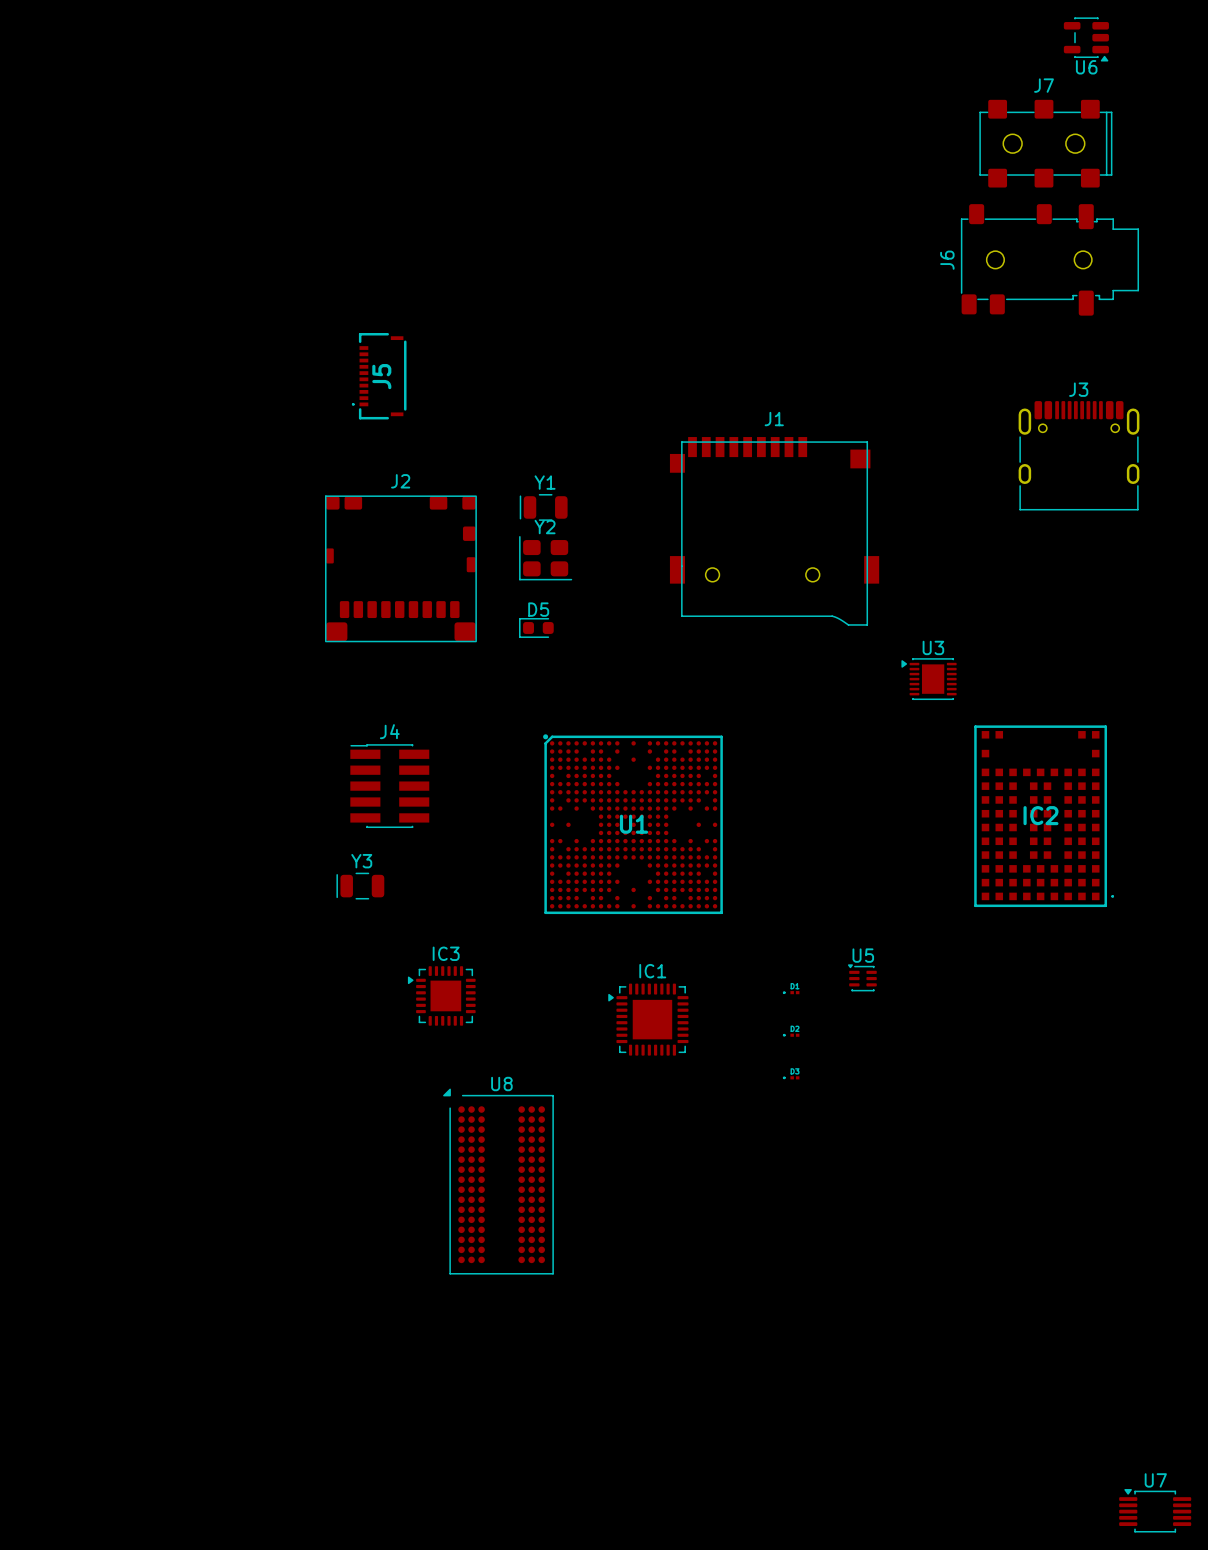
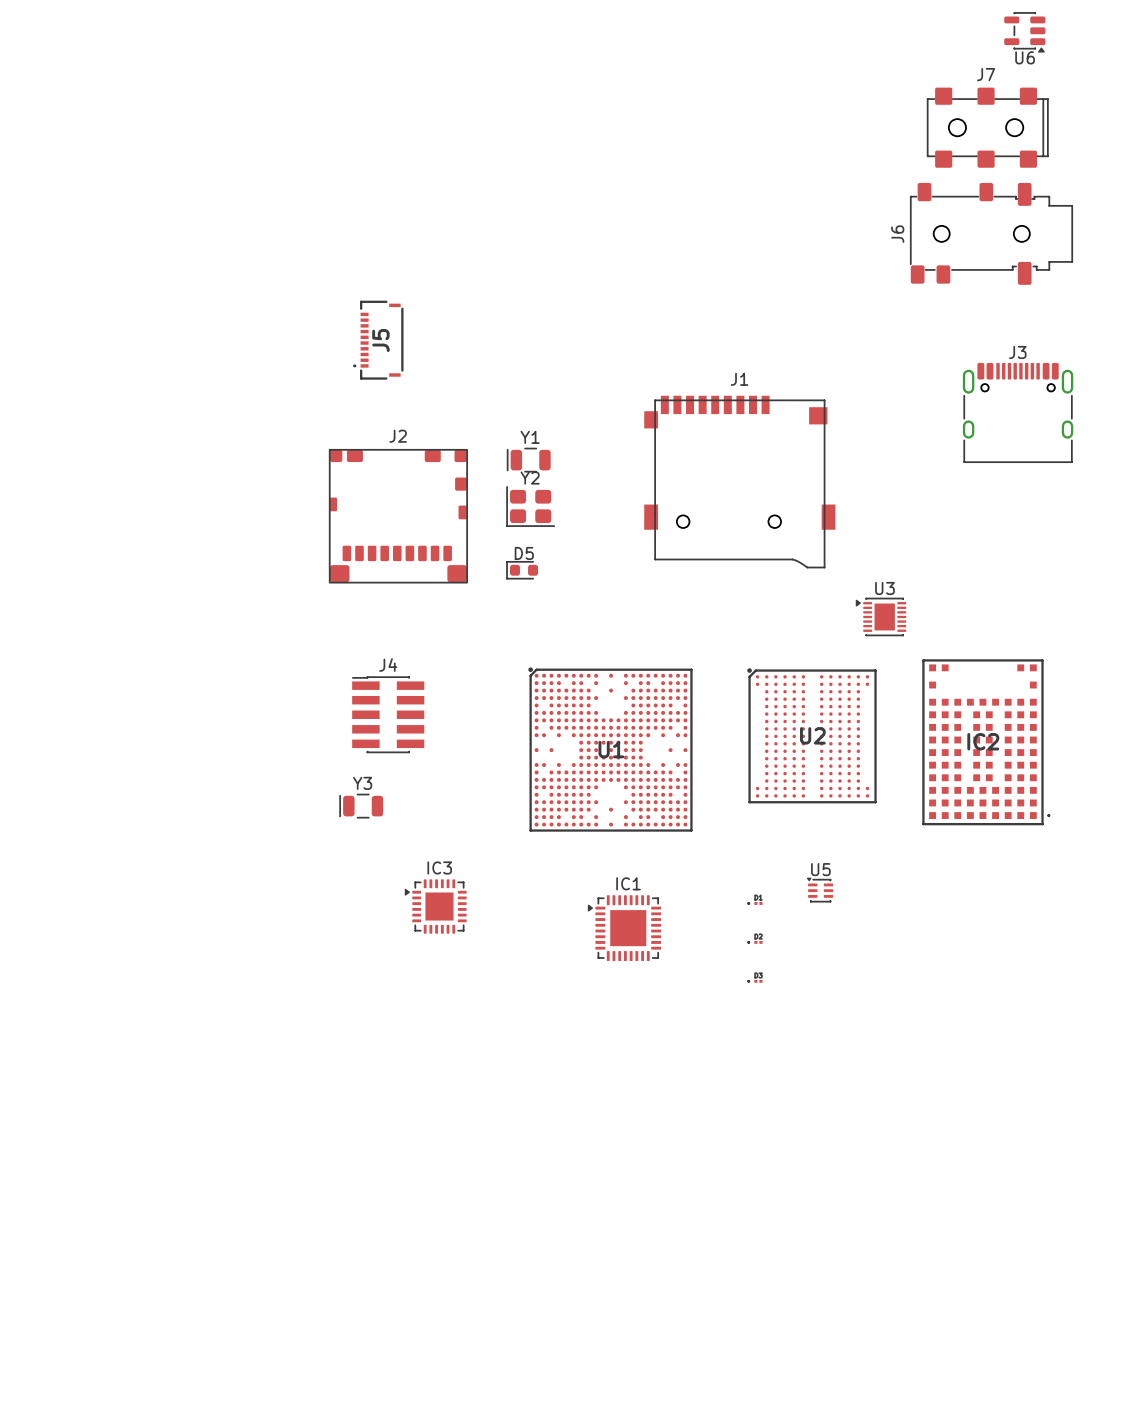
U2: none -> (811, 735)
U8: (498, 1181) -> none
U7: (1155, 1510) -> none

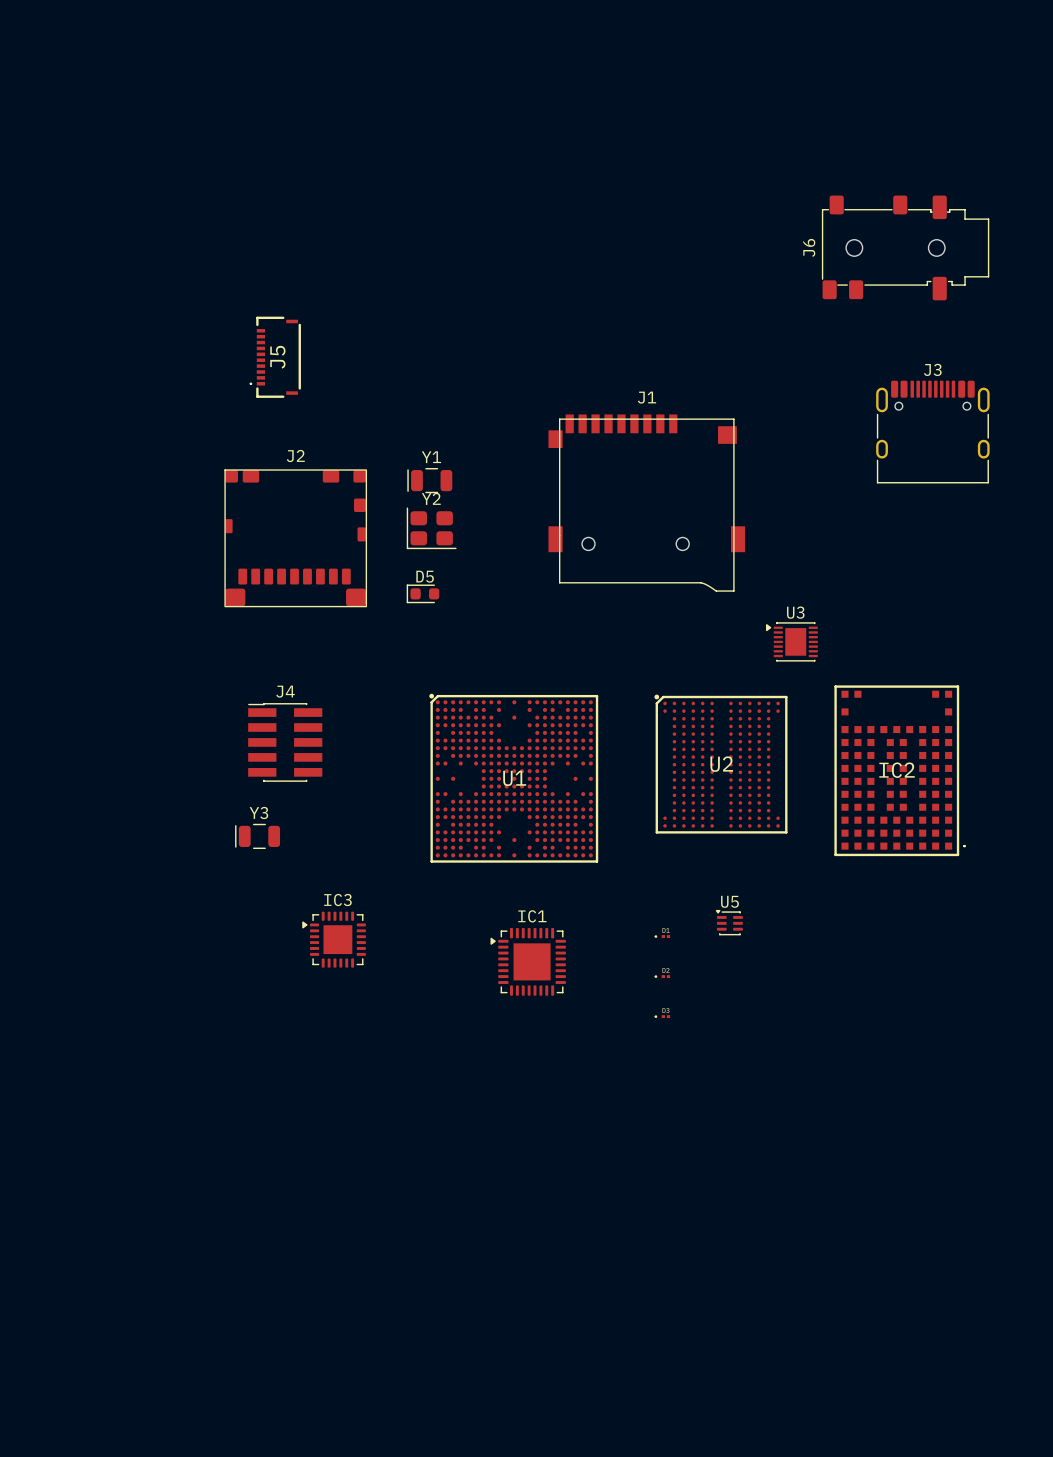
U6: (1024, 32) -> none
J7: (987, 127) -> none

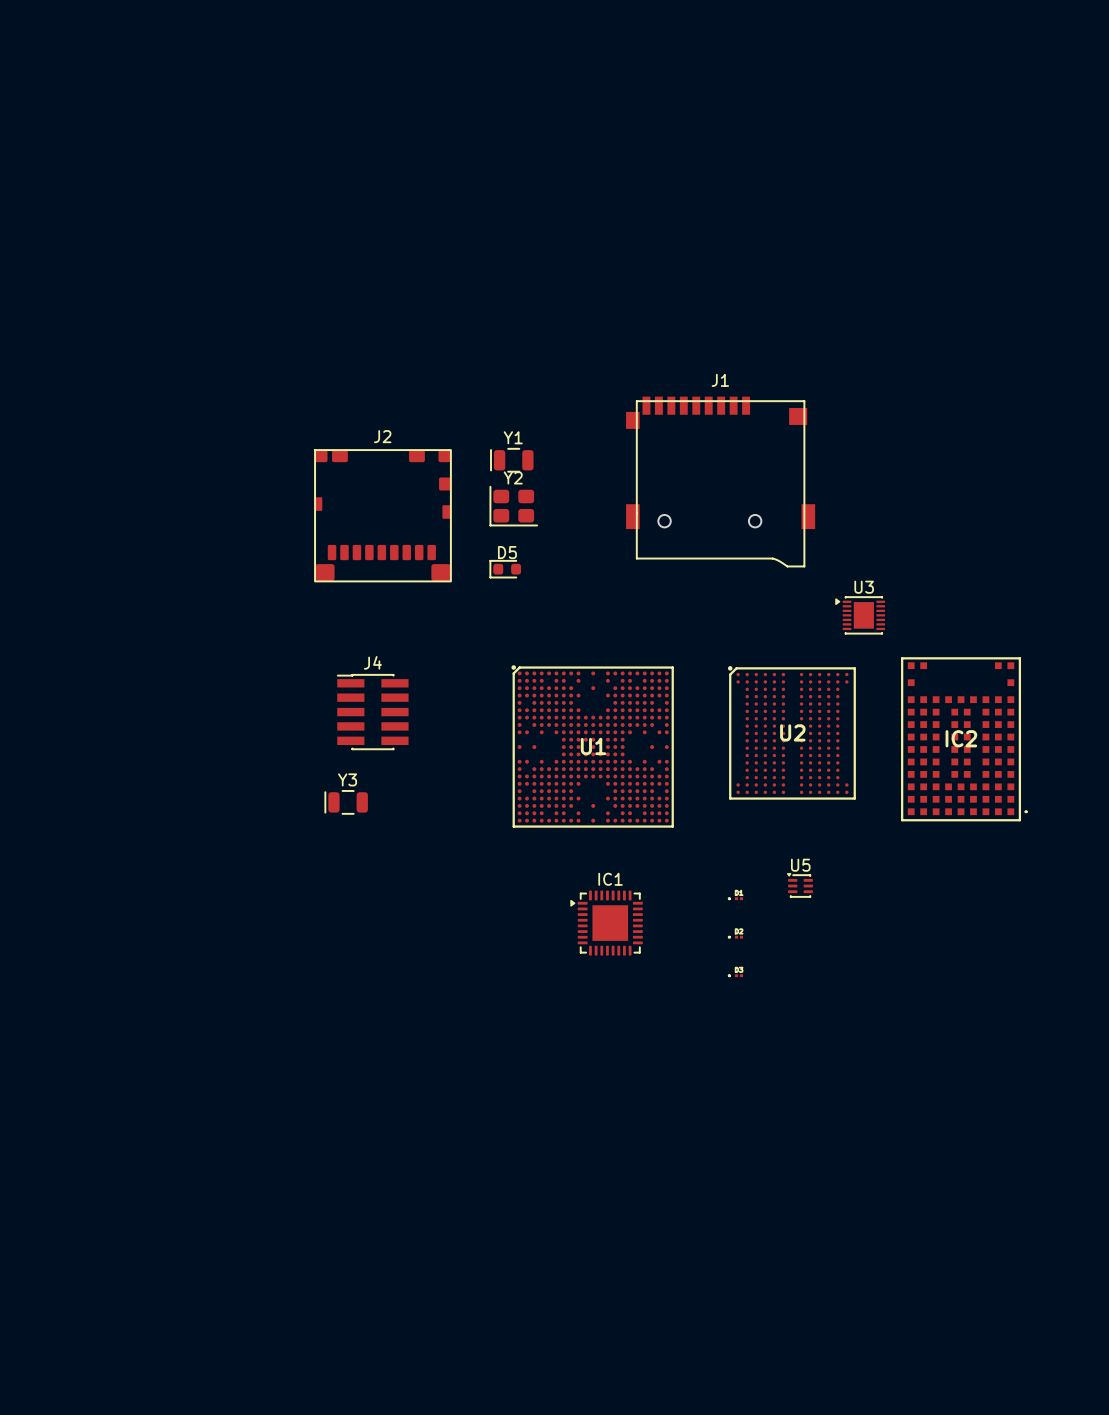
J6: (905, 247) -> none
J5: (275, 357) -> none
J3: (932, 432) -> none
IC3: (334, 939) -> none

